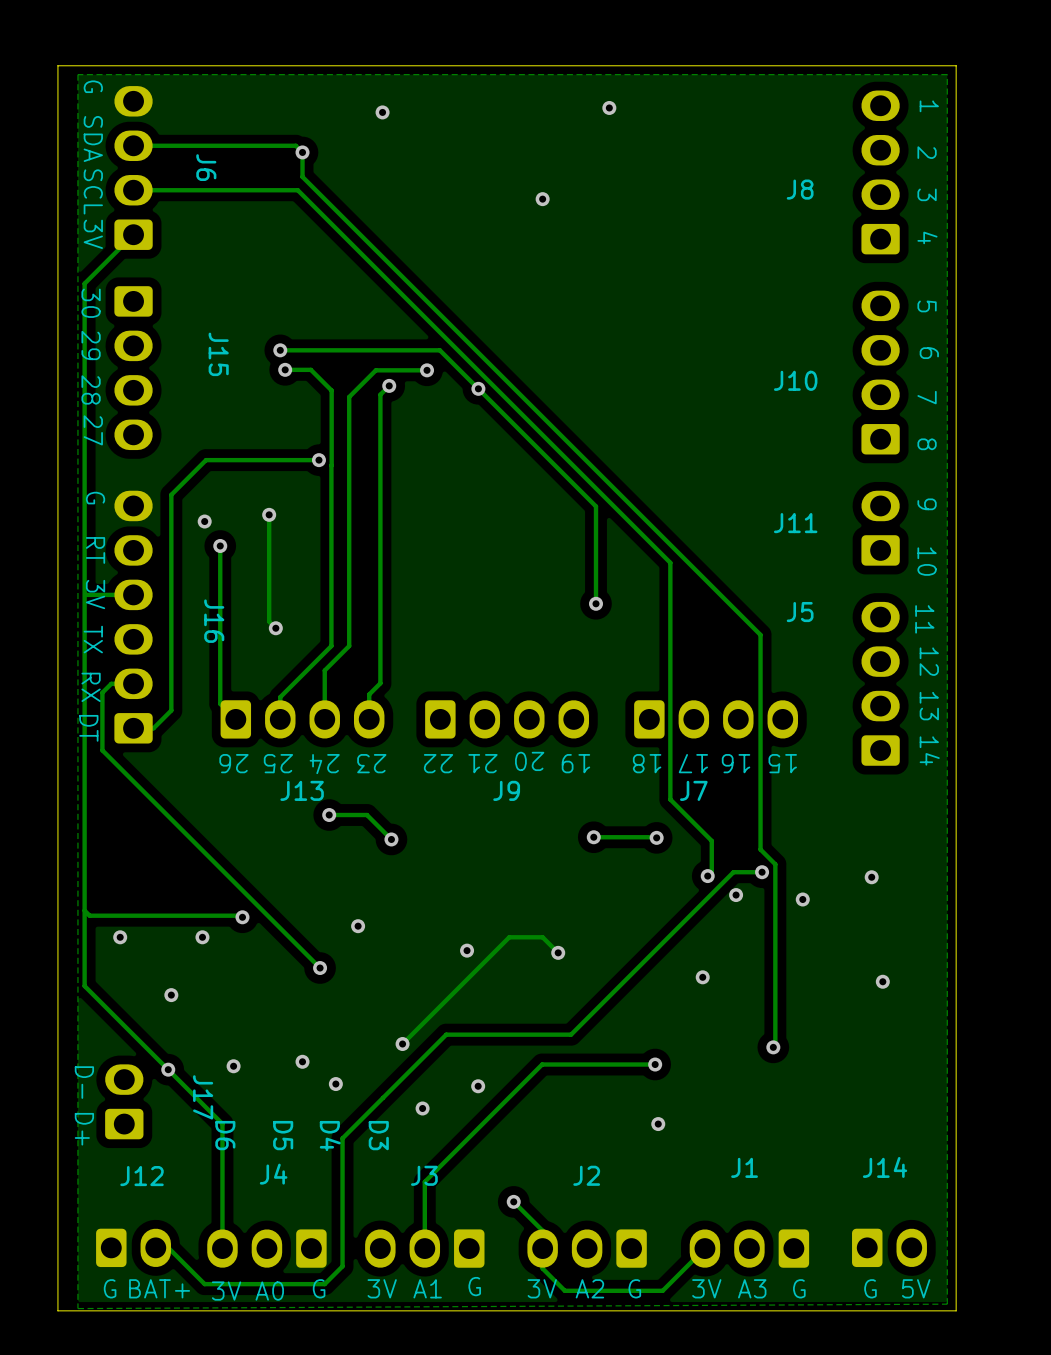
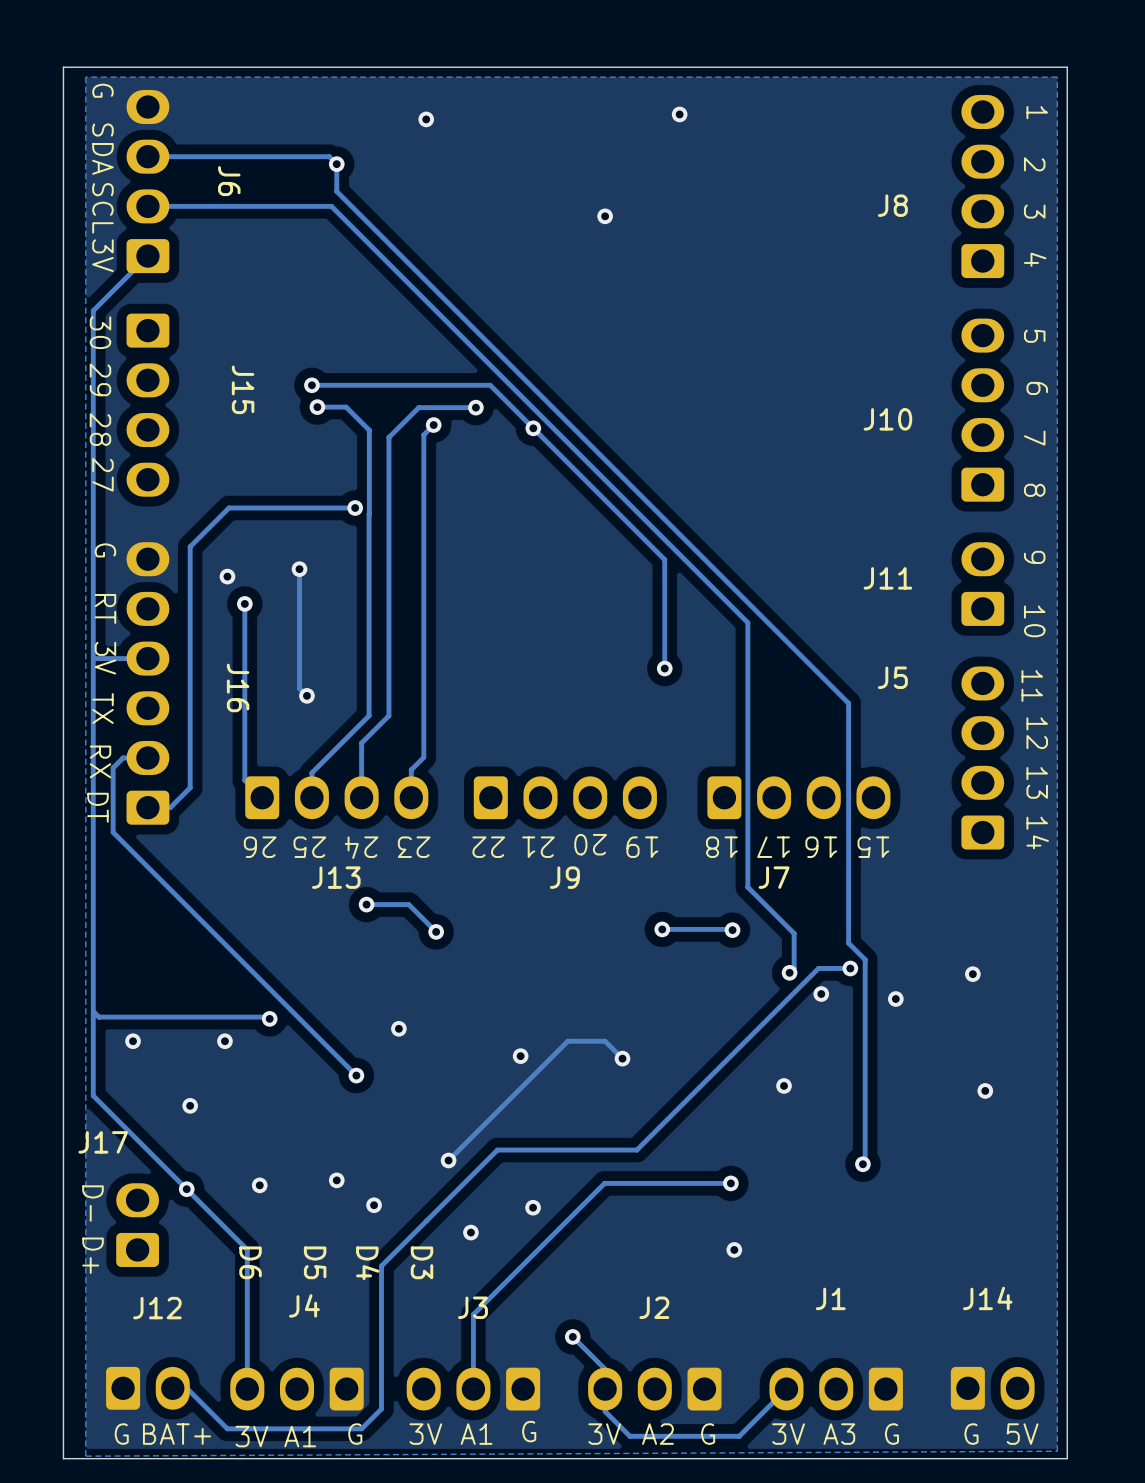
J17 name rotation: 0° (203, 1097) -> 90° counterclockwise (103, 1142)
J17 name position: J17 (203, 1097) -> J17 (103, 1142)
text: A0 (269, 1291) -> A1 (300, 1436)

